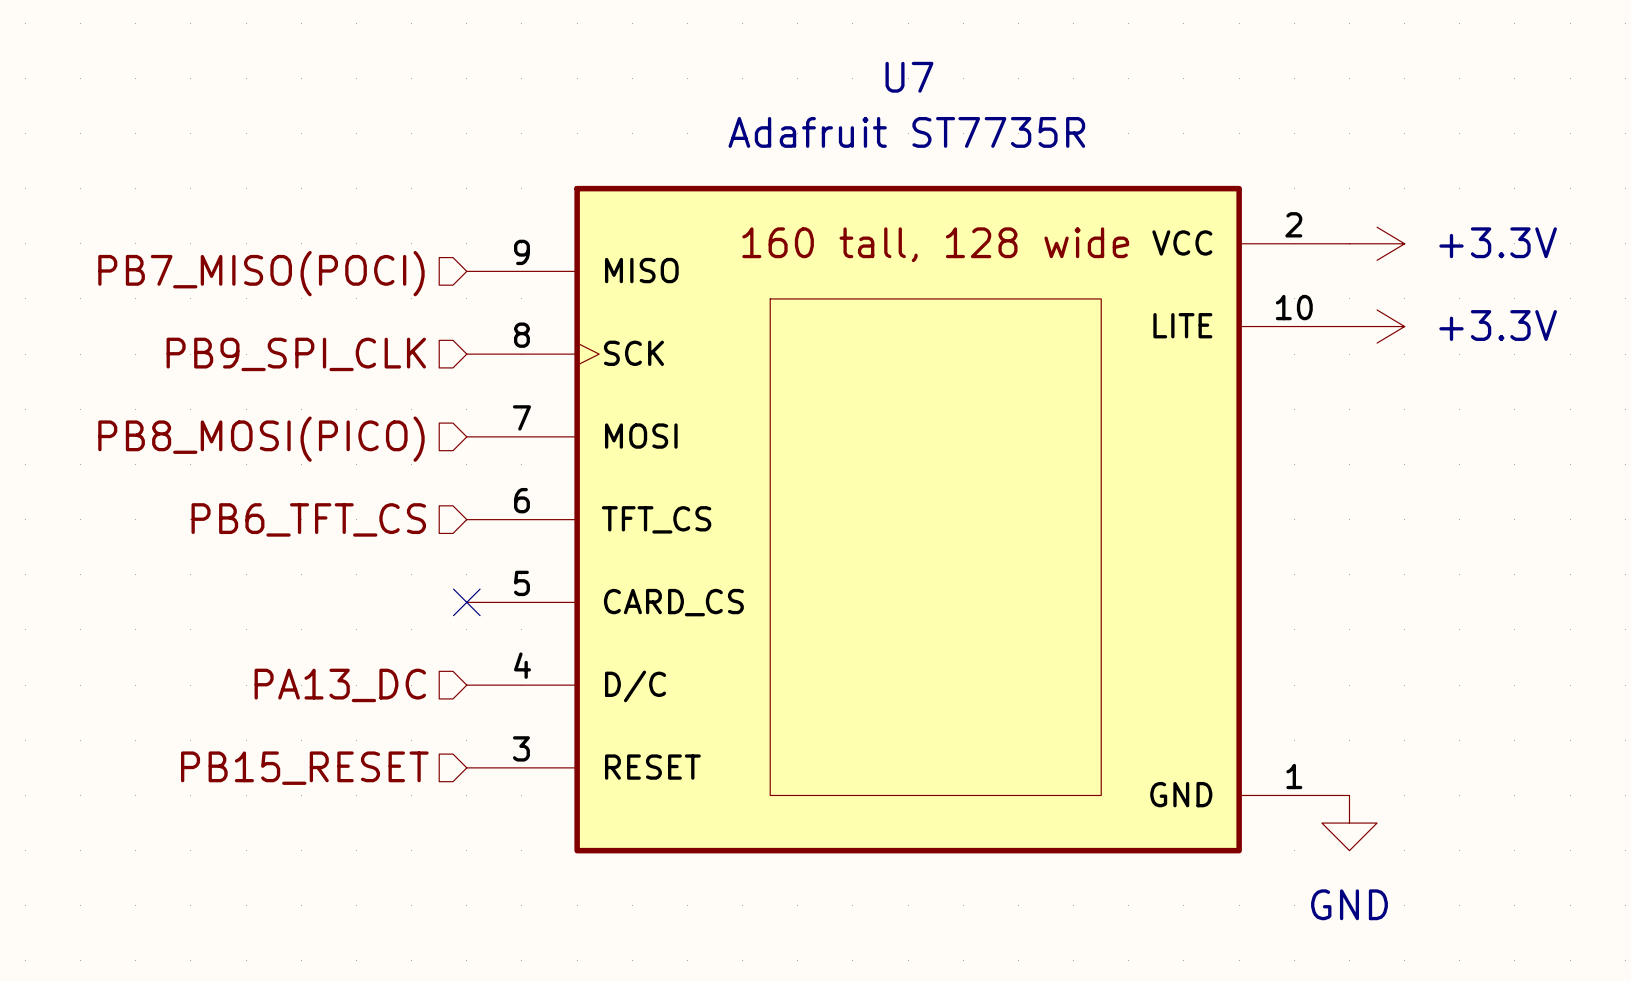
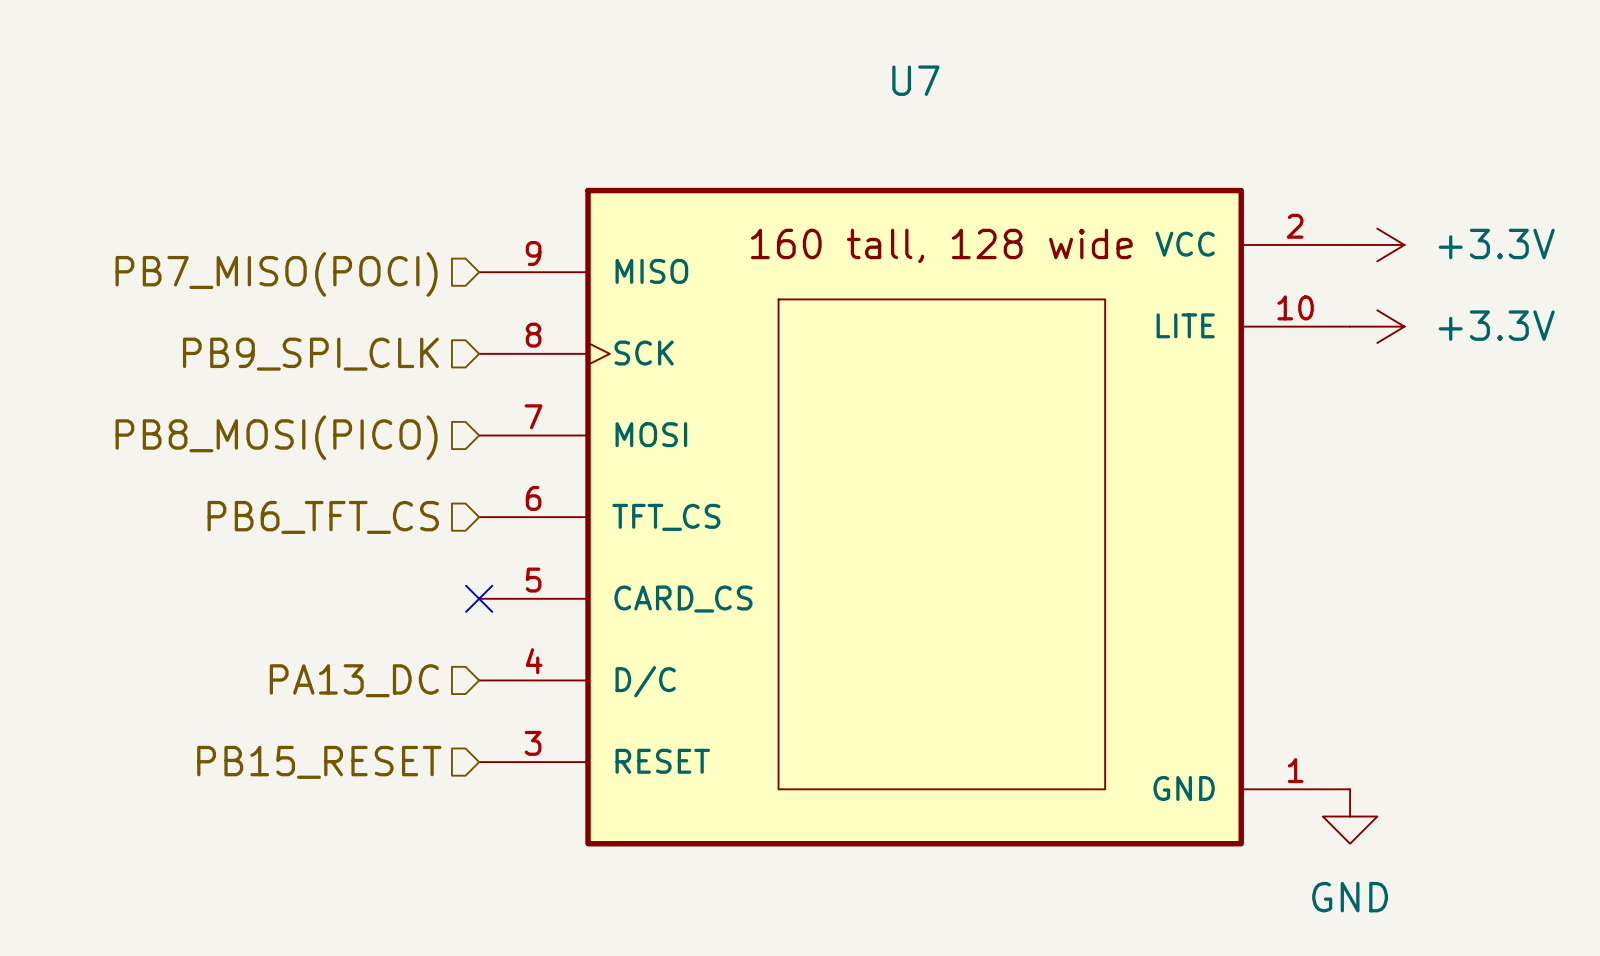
U7 value: Adafruit ST7735R (906, 132) -> none

